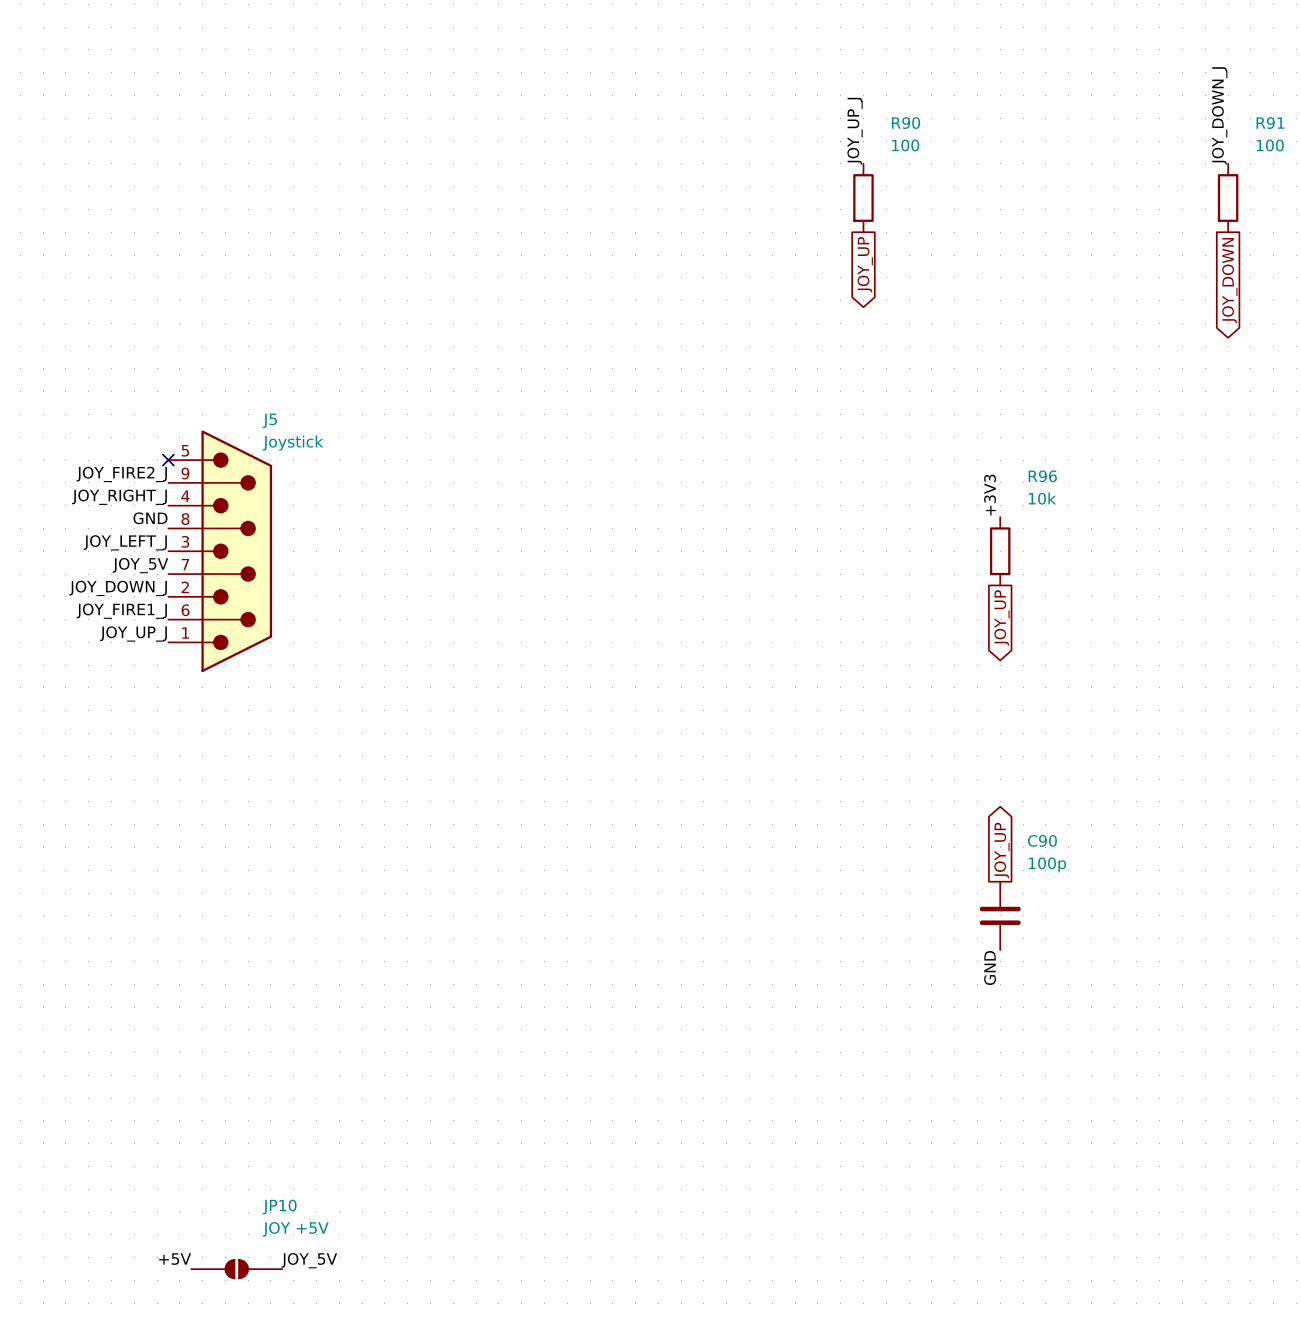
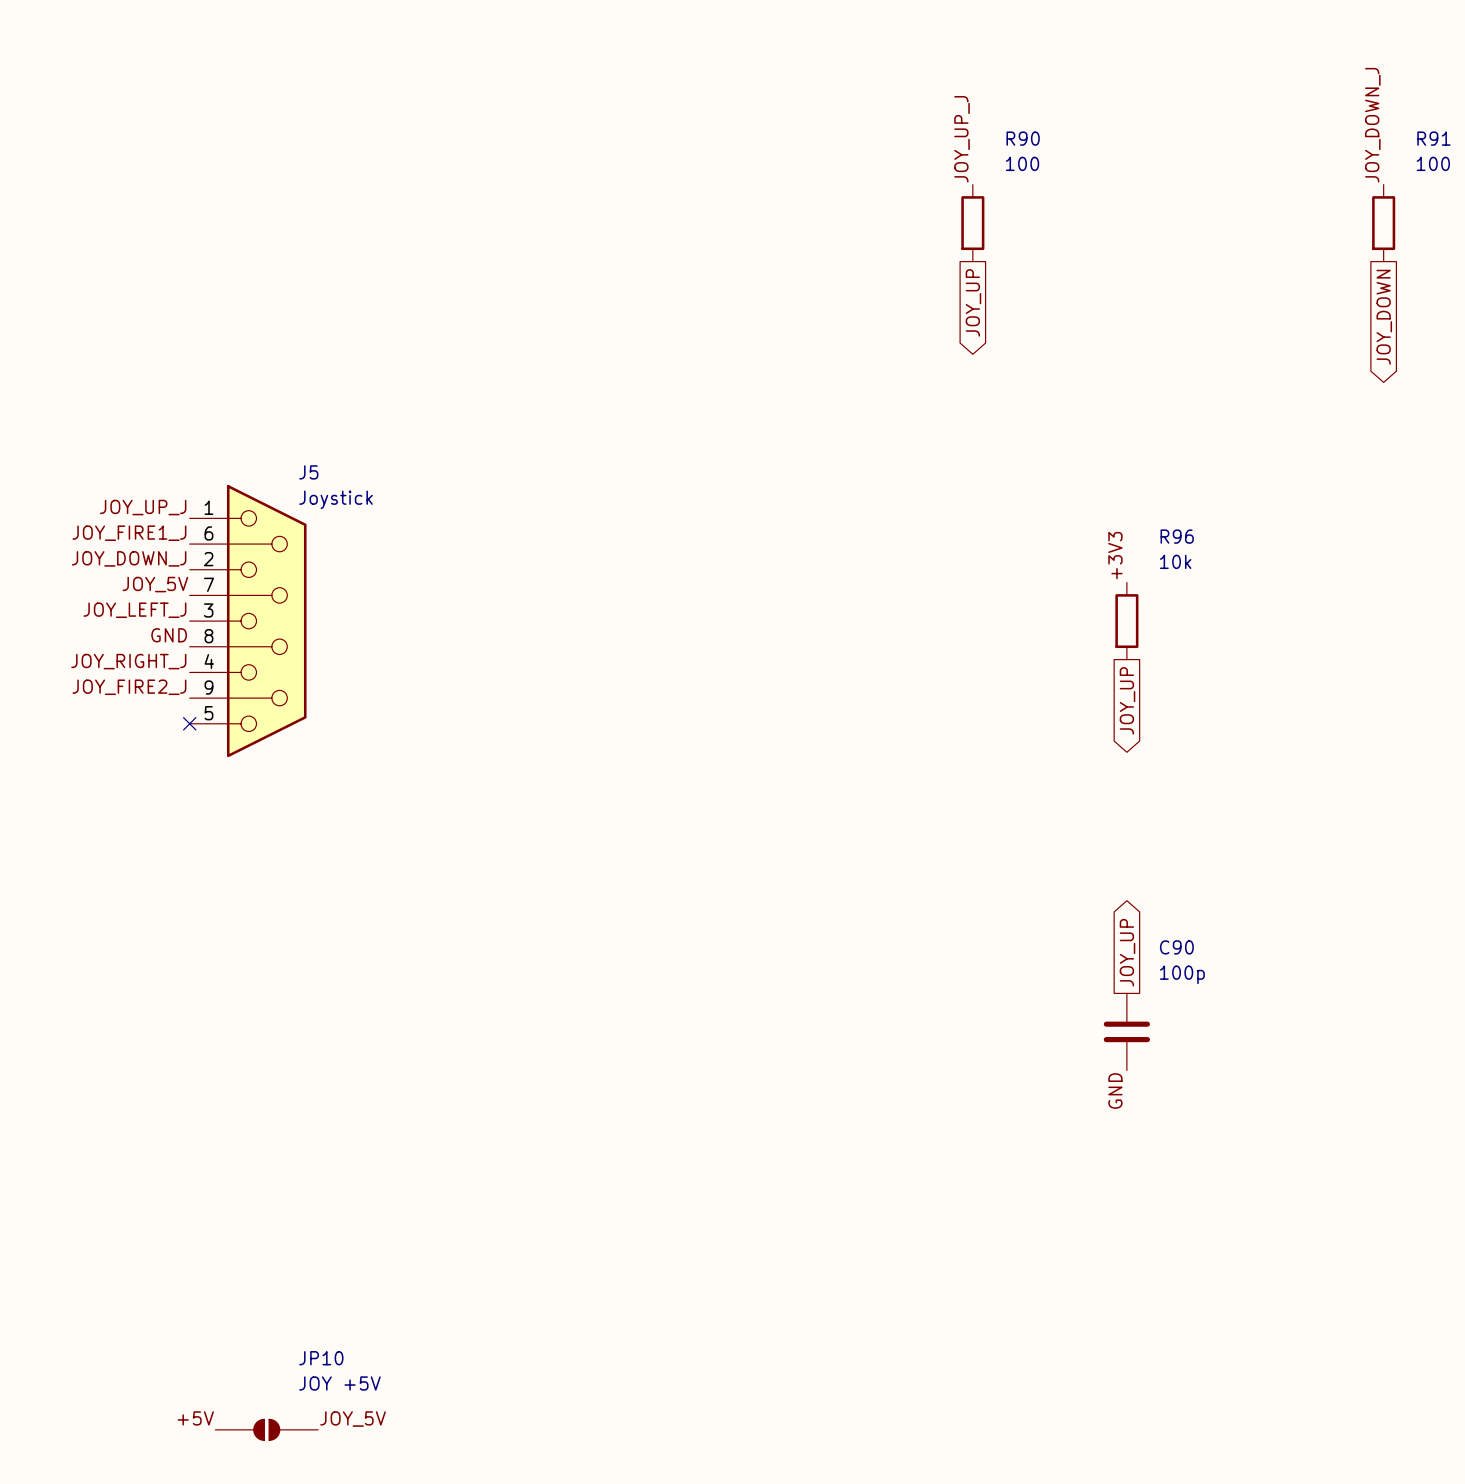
J5 symbol: [168, 430, 273, 673] -> [189, 485, 307, 758]
no-connect mark: (168, 460) -> none
label: JOY_FIRE2_J (121, 474) -> JOY_FIRE1_J (129, 533)
label: JOY_RIGHT_J (119, 497) -> JOY_DOWN_J (129, 558)
label: GND (150, 518) -> JOY_5V (155, 584)
label: JOY_5V (140, 565) -> GND (169, 635)
label: JOY_DOWN_J (118, 588) -> JOY_RIGHT_J (128, 661)
label: JOY_FIRE1_J (121, 611) -> JOY_FIRE2_J (129, 687)
label position: JOY_UP_J (133, 633) -> JOY_UP_J (143, 507)
no-connect mark: none -> (189, 723)

